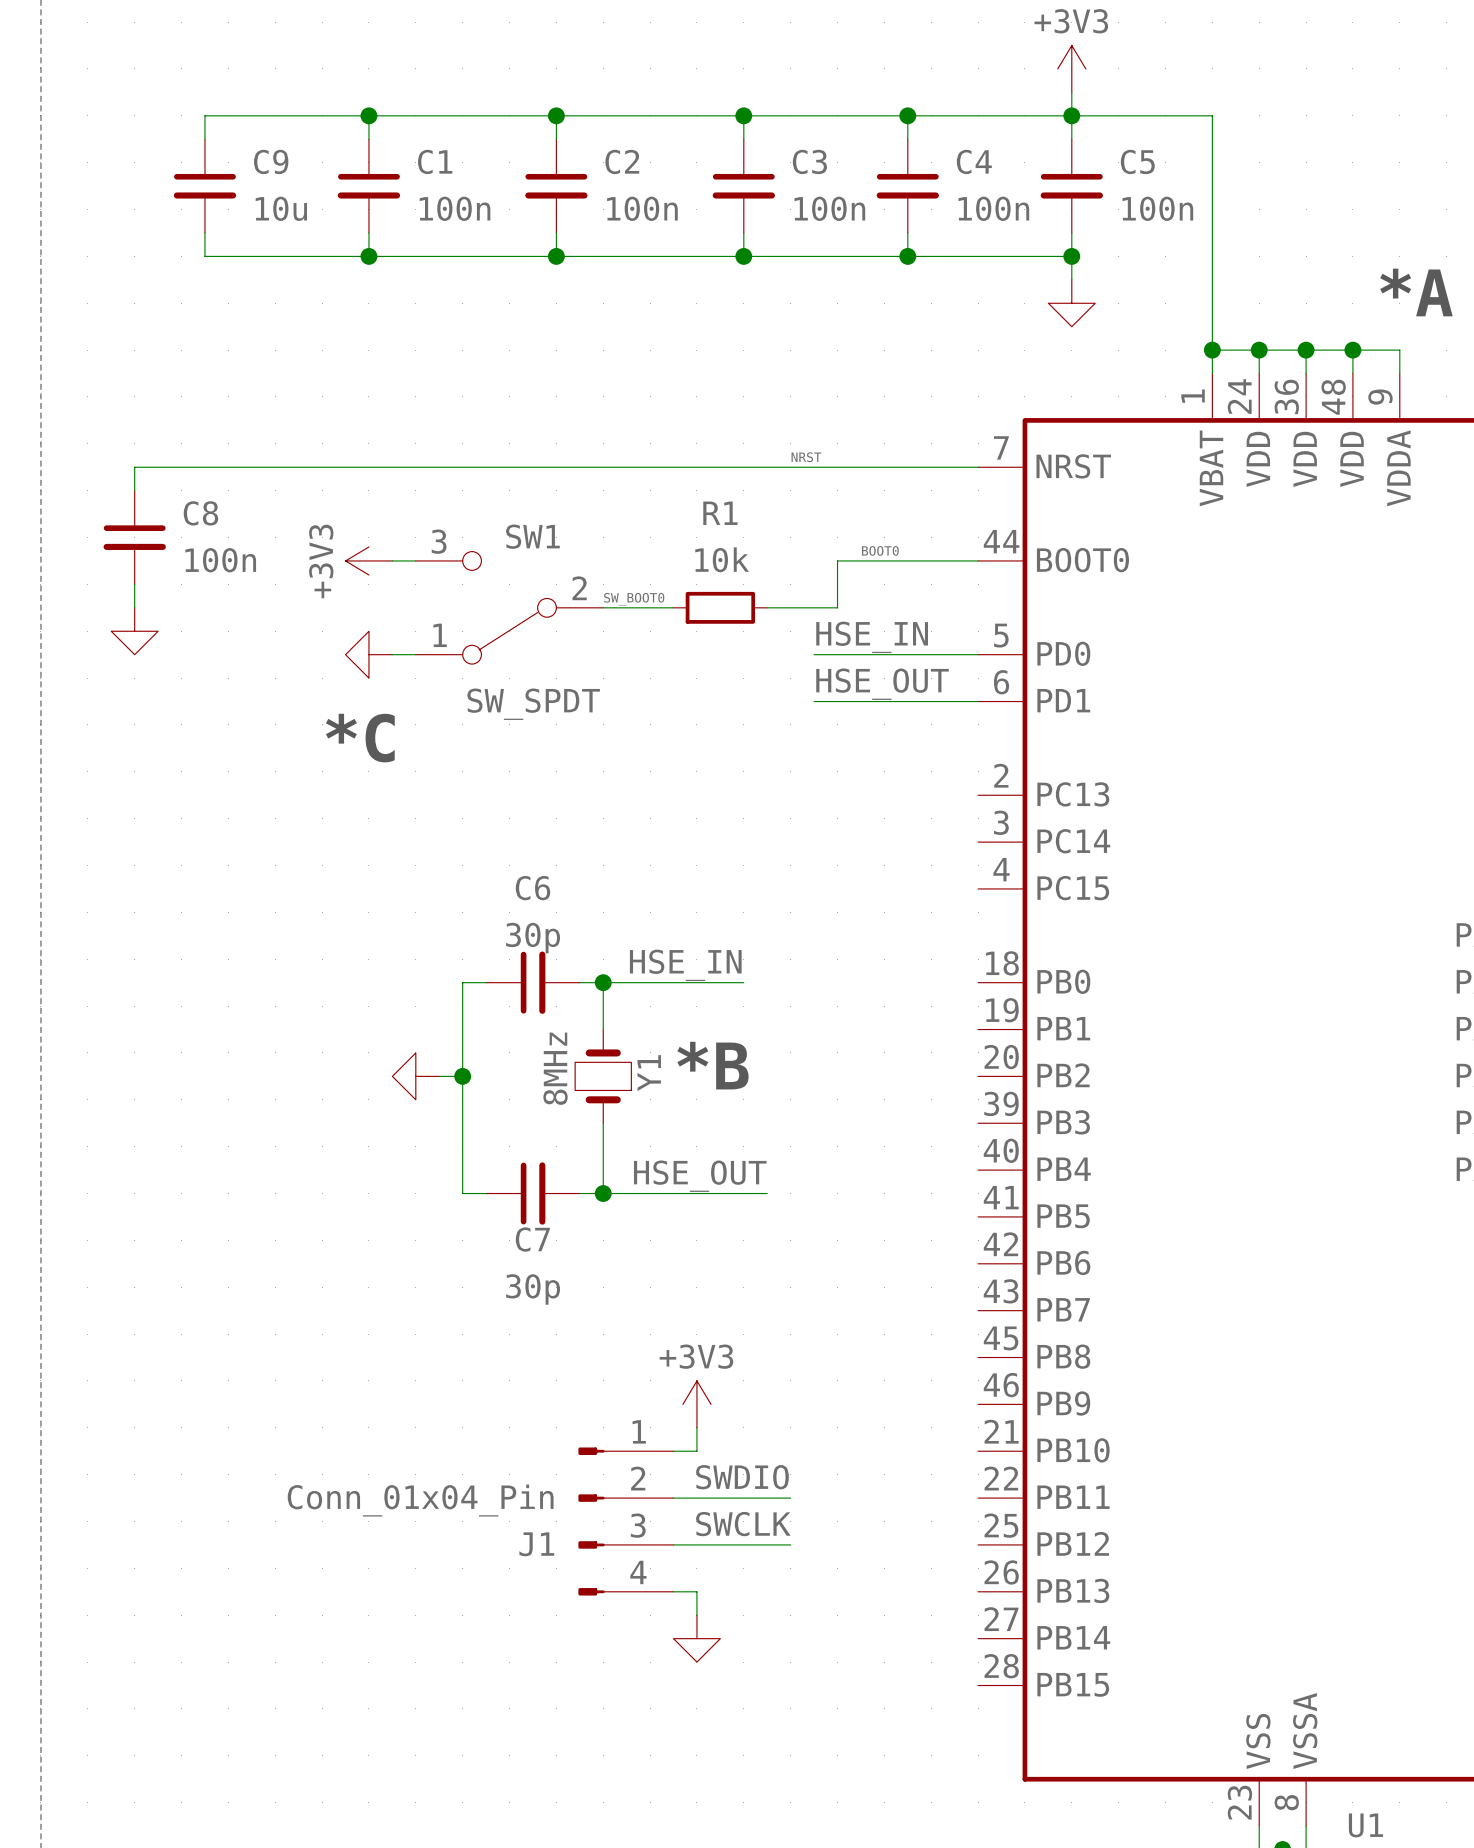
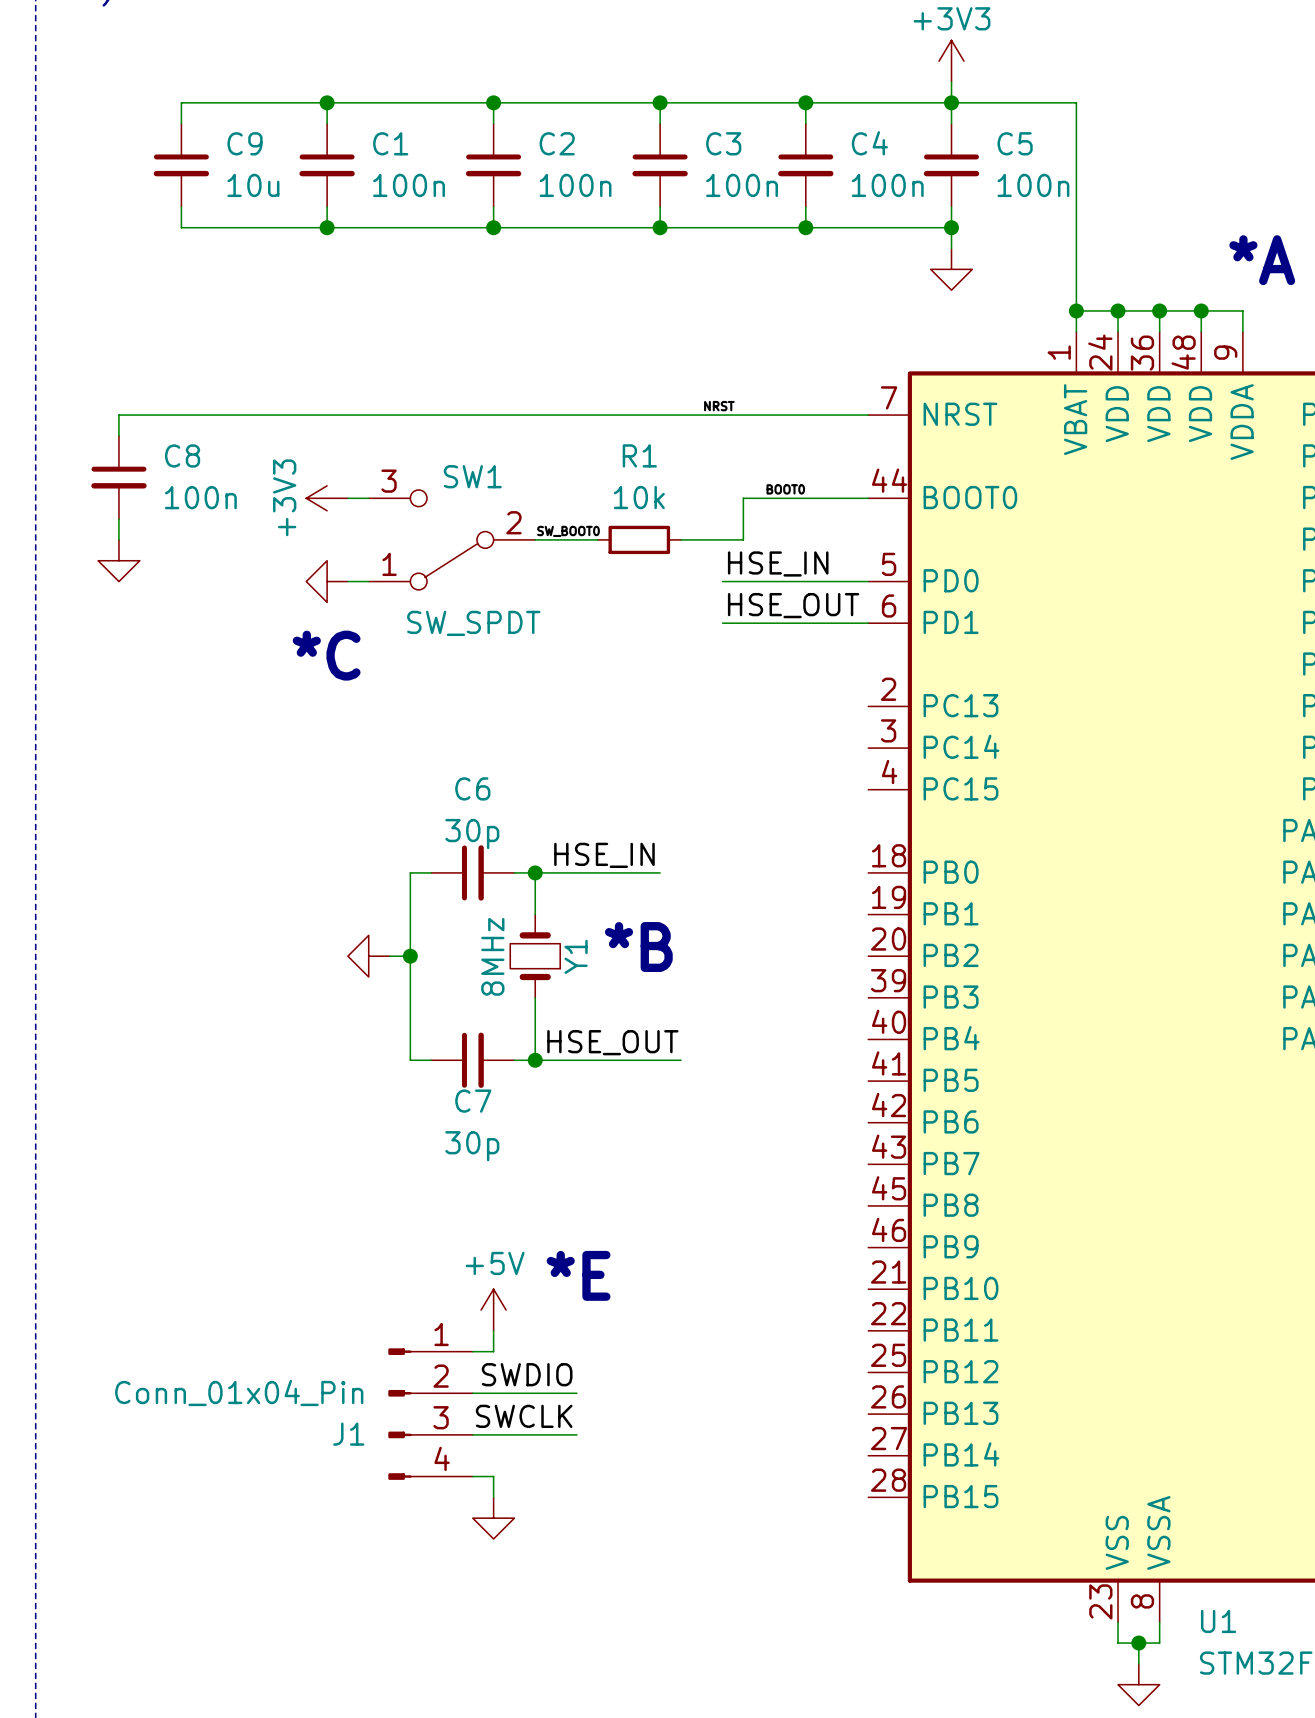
power symbol: +3V3 (696, 1404) -> none
wire: (696, 1427) (696, 1451) (673, 1451) -> (493, 1330) (493, 1351) (472, 1351)
text: none -> *E (578, 1275)
power symbol: none -> +5V (493, 1310)
label position: SWDIO (742, 1477) -> SWDIO (527, 1374)
wire: (673, 1498) (790, 1498) -> (472, 1434) (576, 1434)
J1 position: (625, 1521) -> (430, 1414)
label position: SWCLK (743, 1524) -> SWCLK (524, 1416)
wire: (673, 1544) (790, 1544) -> (472, 1393) (576, 1393)
wire: (673, 1591) (696, 1591) (696, 1615) -> (472, 1476) (493, 1476) (493, 1497)
power symbol position: (696, 1638) -> (493, 1518)

